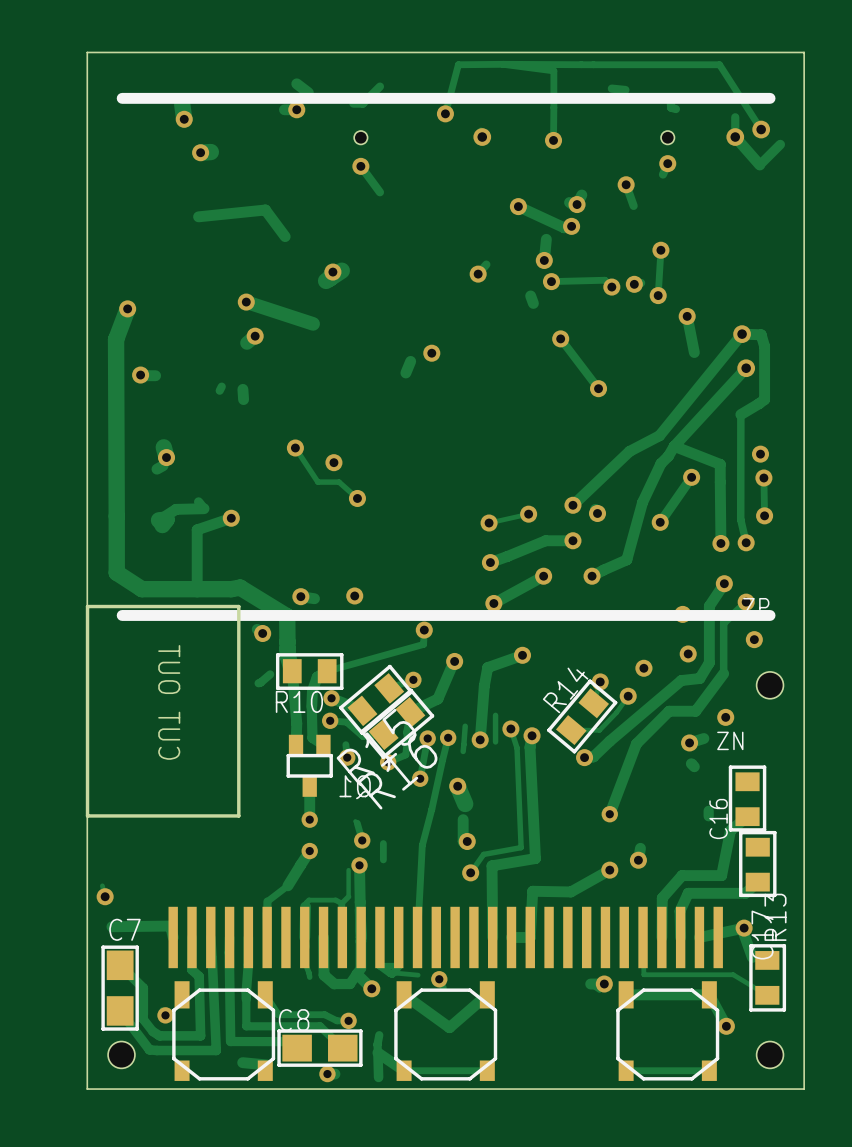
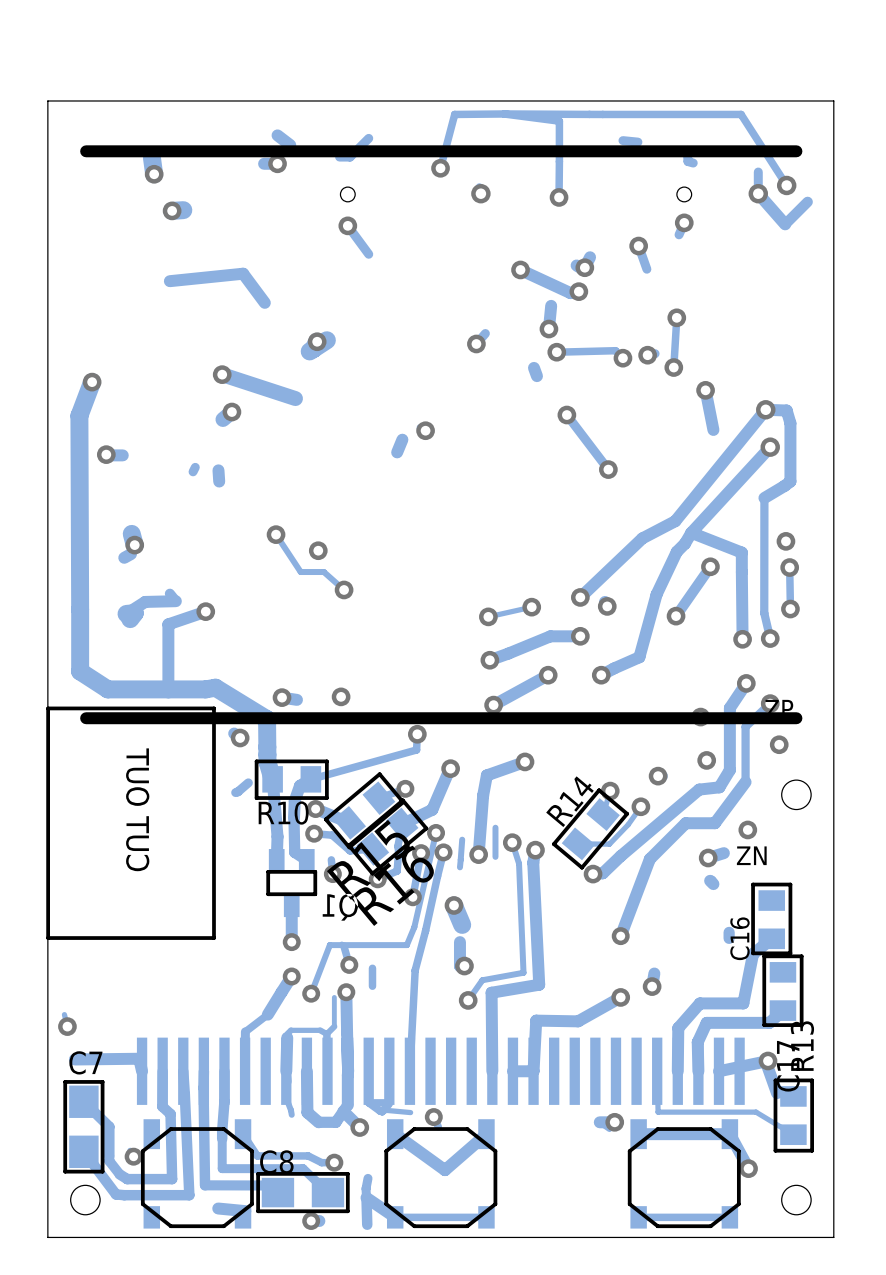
track: none -> (436, 832) (414, 927) (406, 945) (329, 945) (311, 993)
via: none -> (436, 832)
via: none -> (311, 993)

